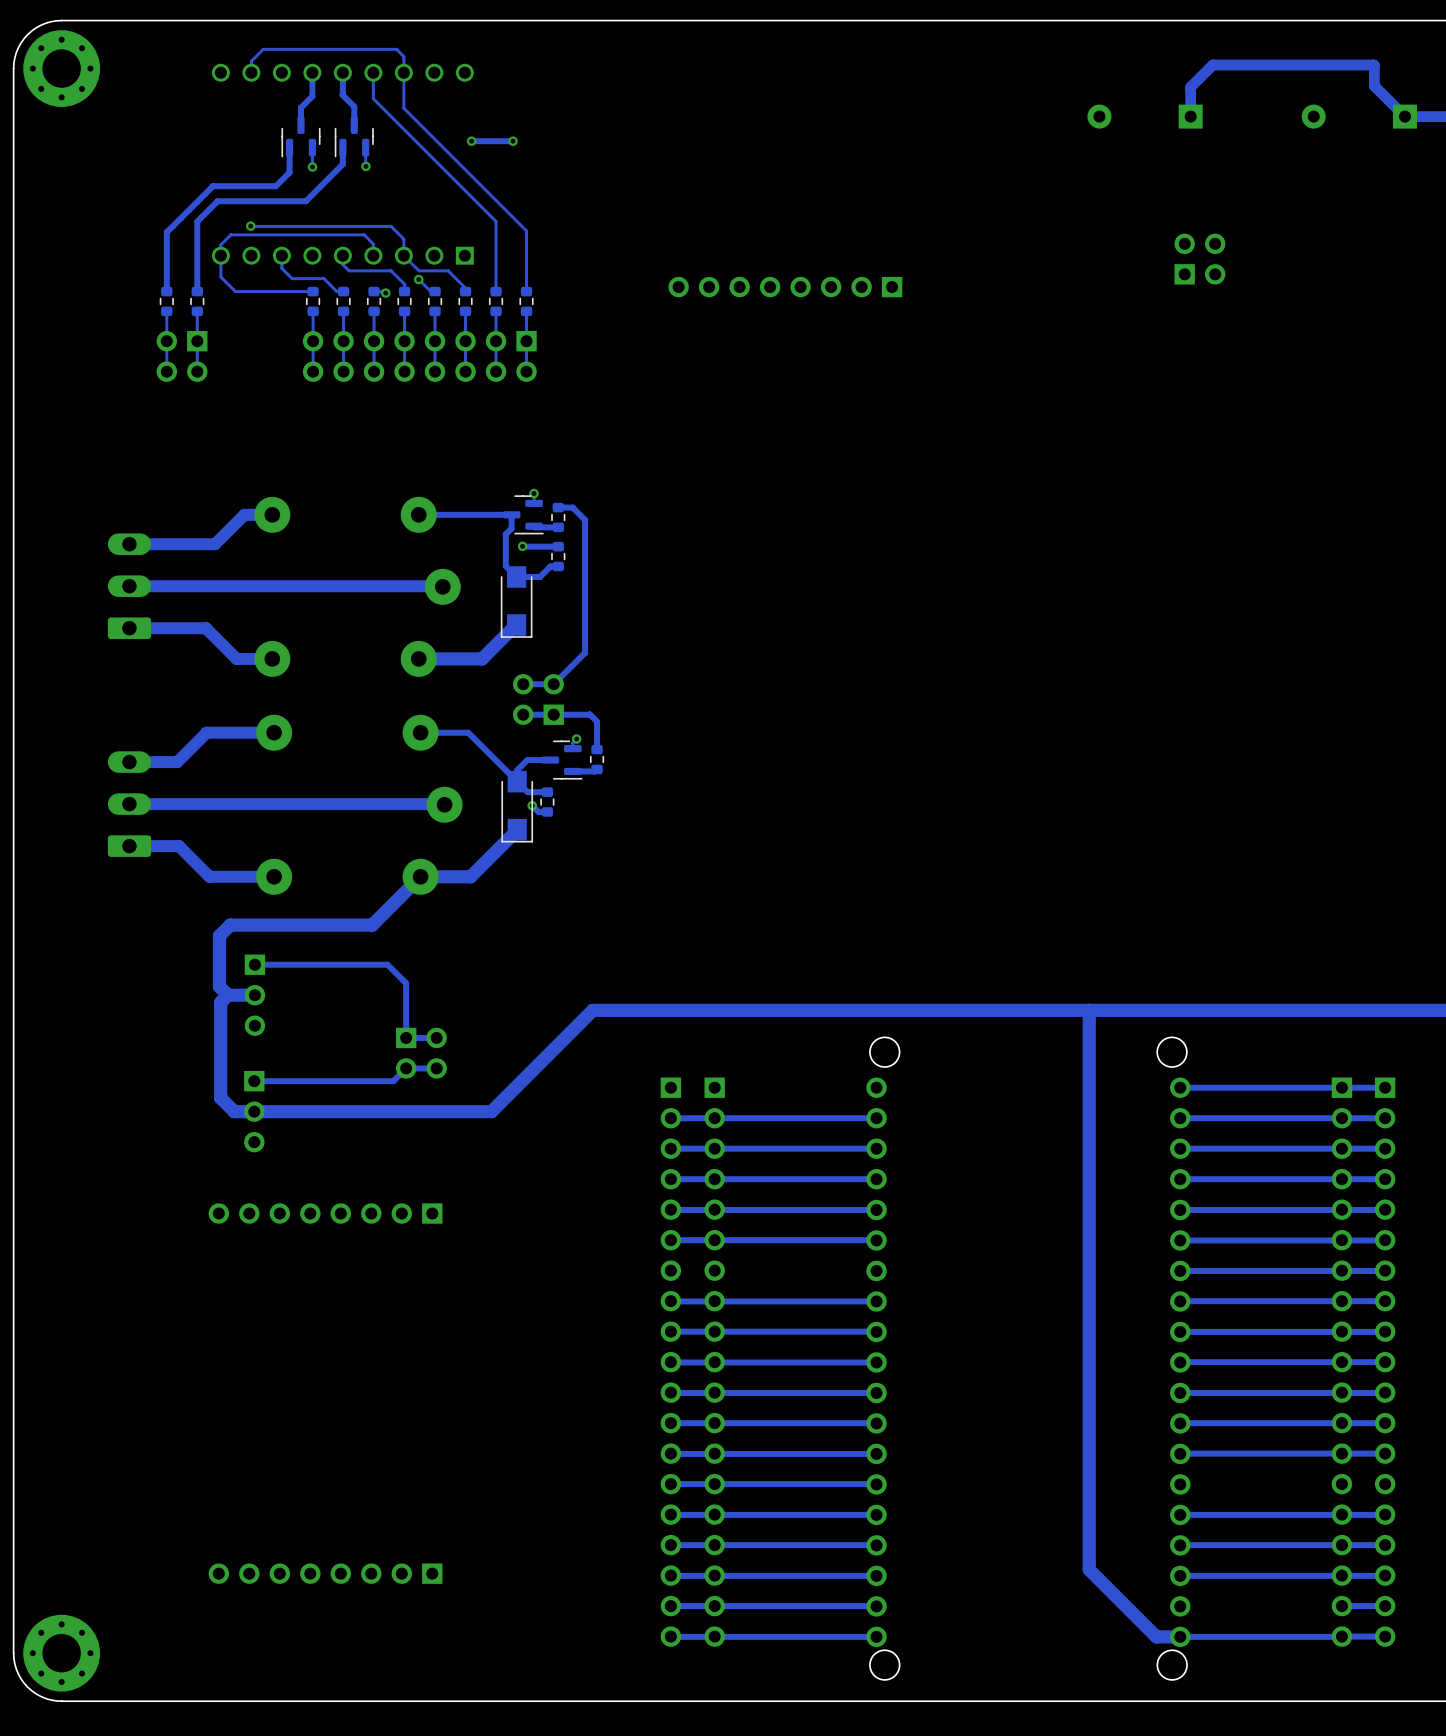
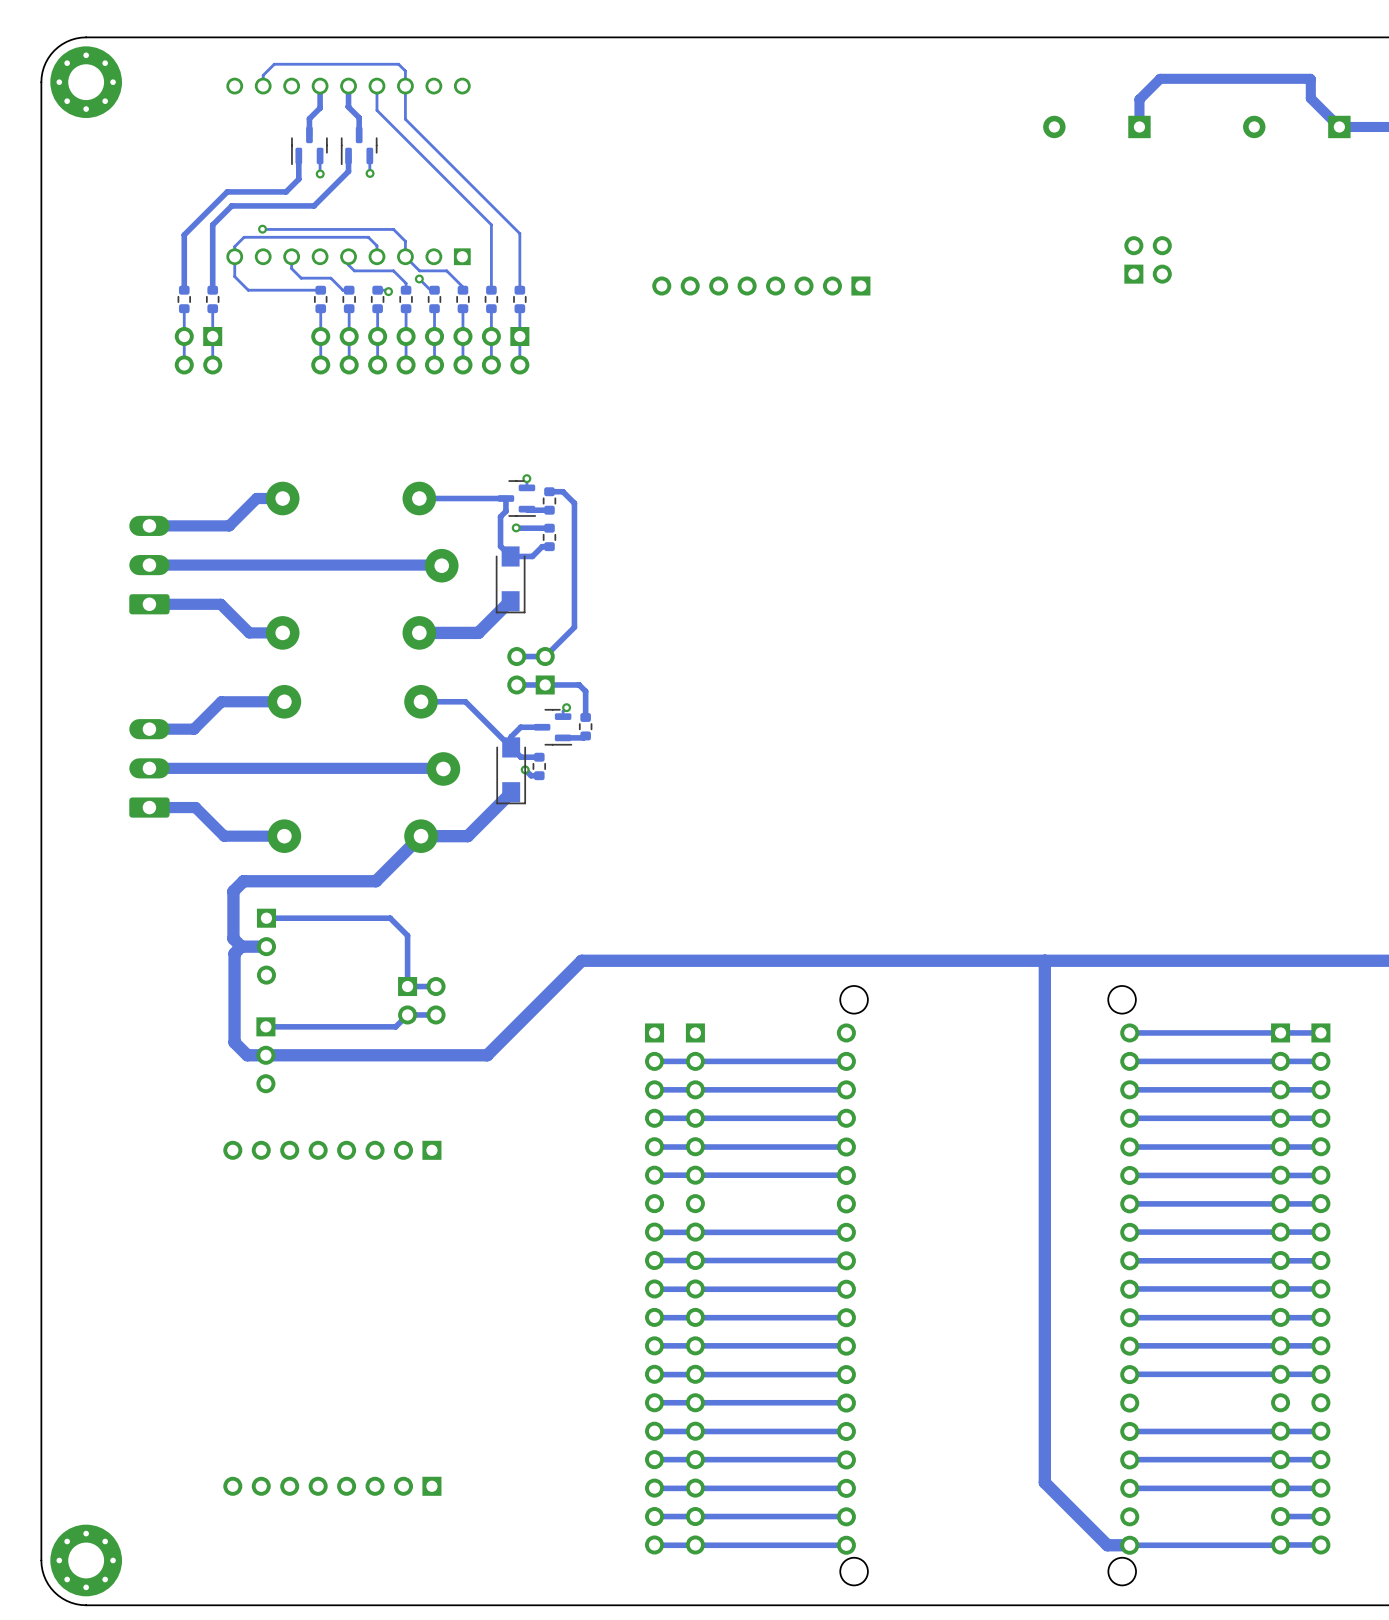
via: (471, 141) -> none
track: (513, 141) (471, 141) -> none
via: (513, 141) -> none

